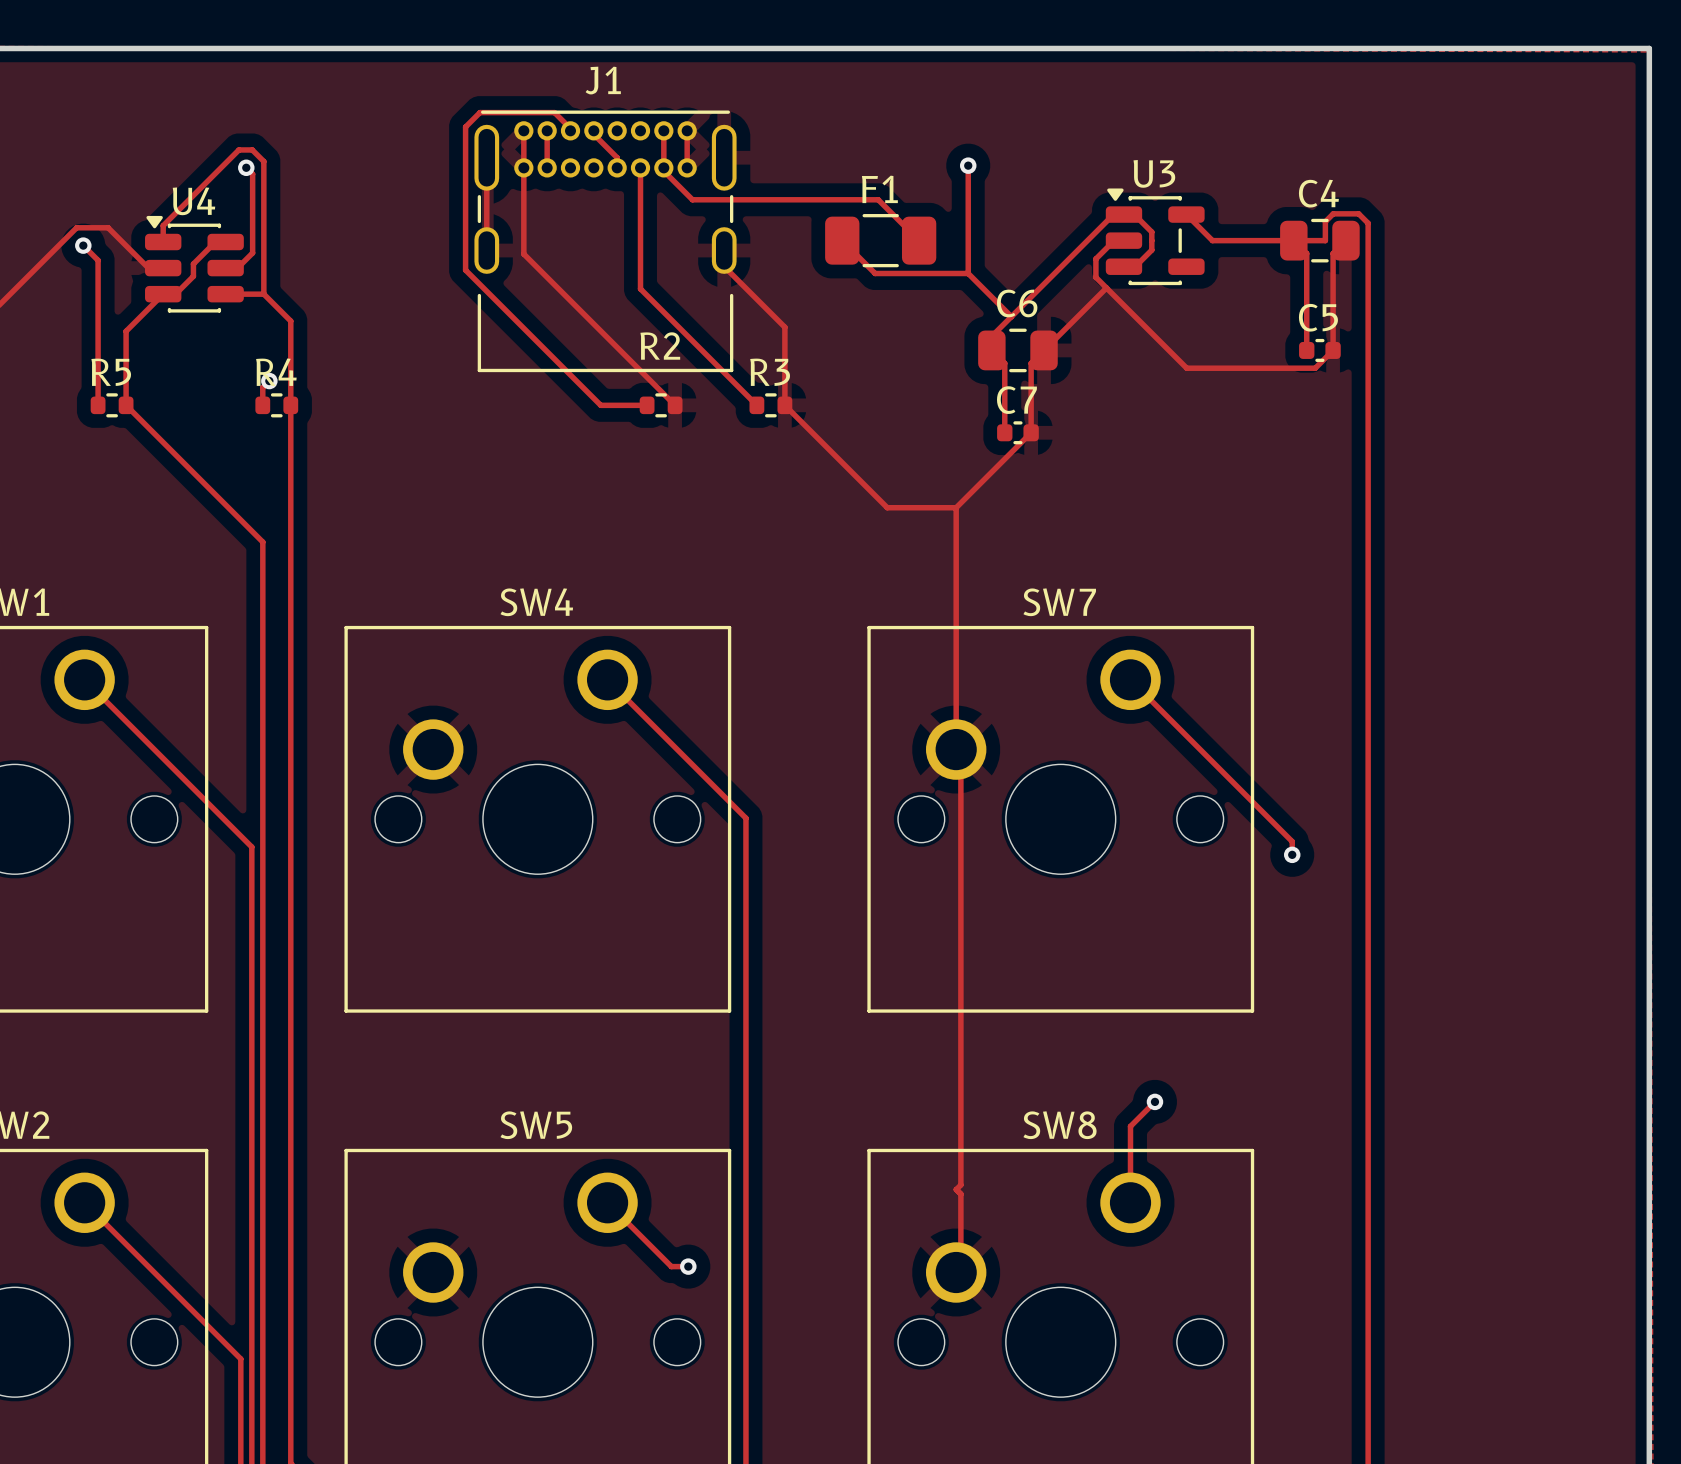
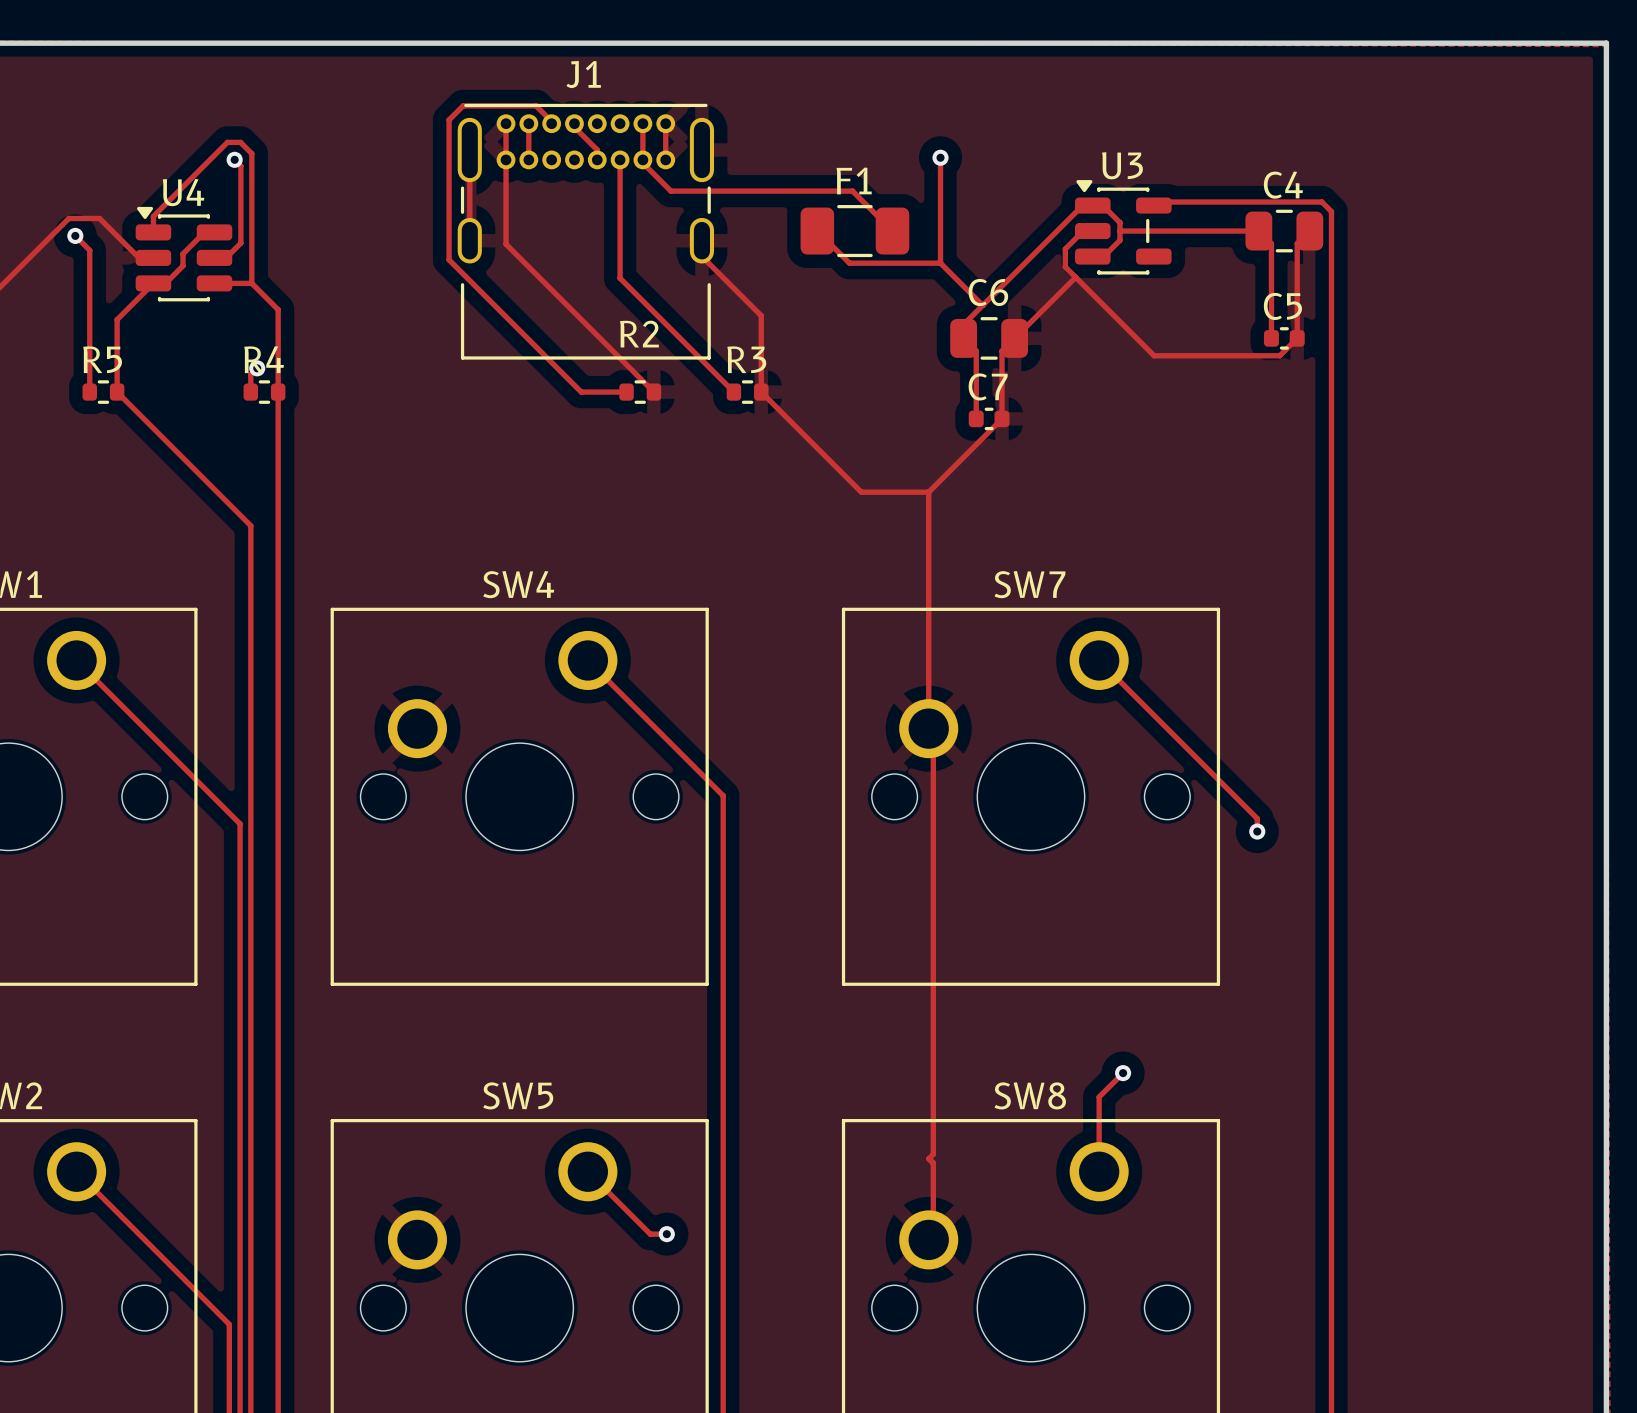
track: (1186, 214) (1212, 240) -> (1119, 231) (1179, 231)
track: (1368, 223) (1358, 213) (1333, 213) (1325, 221) (1325, 240) (1293, 240) -> (1331, 214) (1331, 211) (1321, 202) (1157, 202) (1153, 205)

